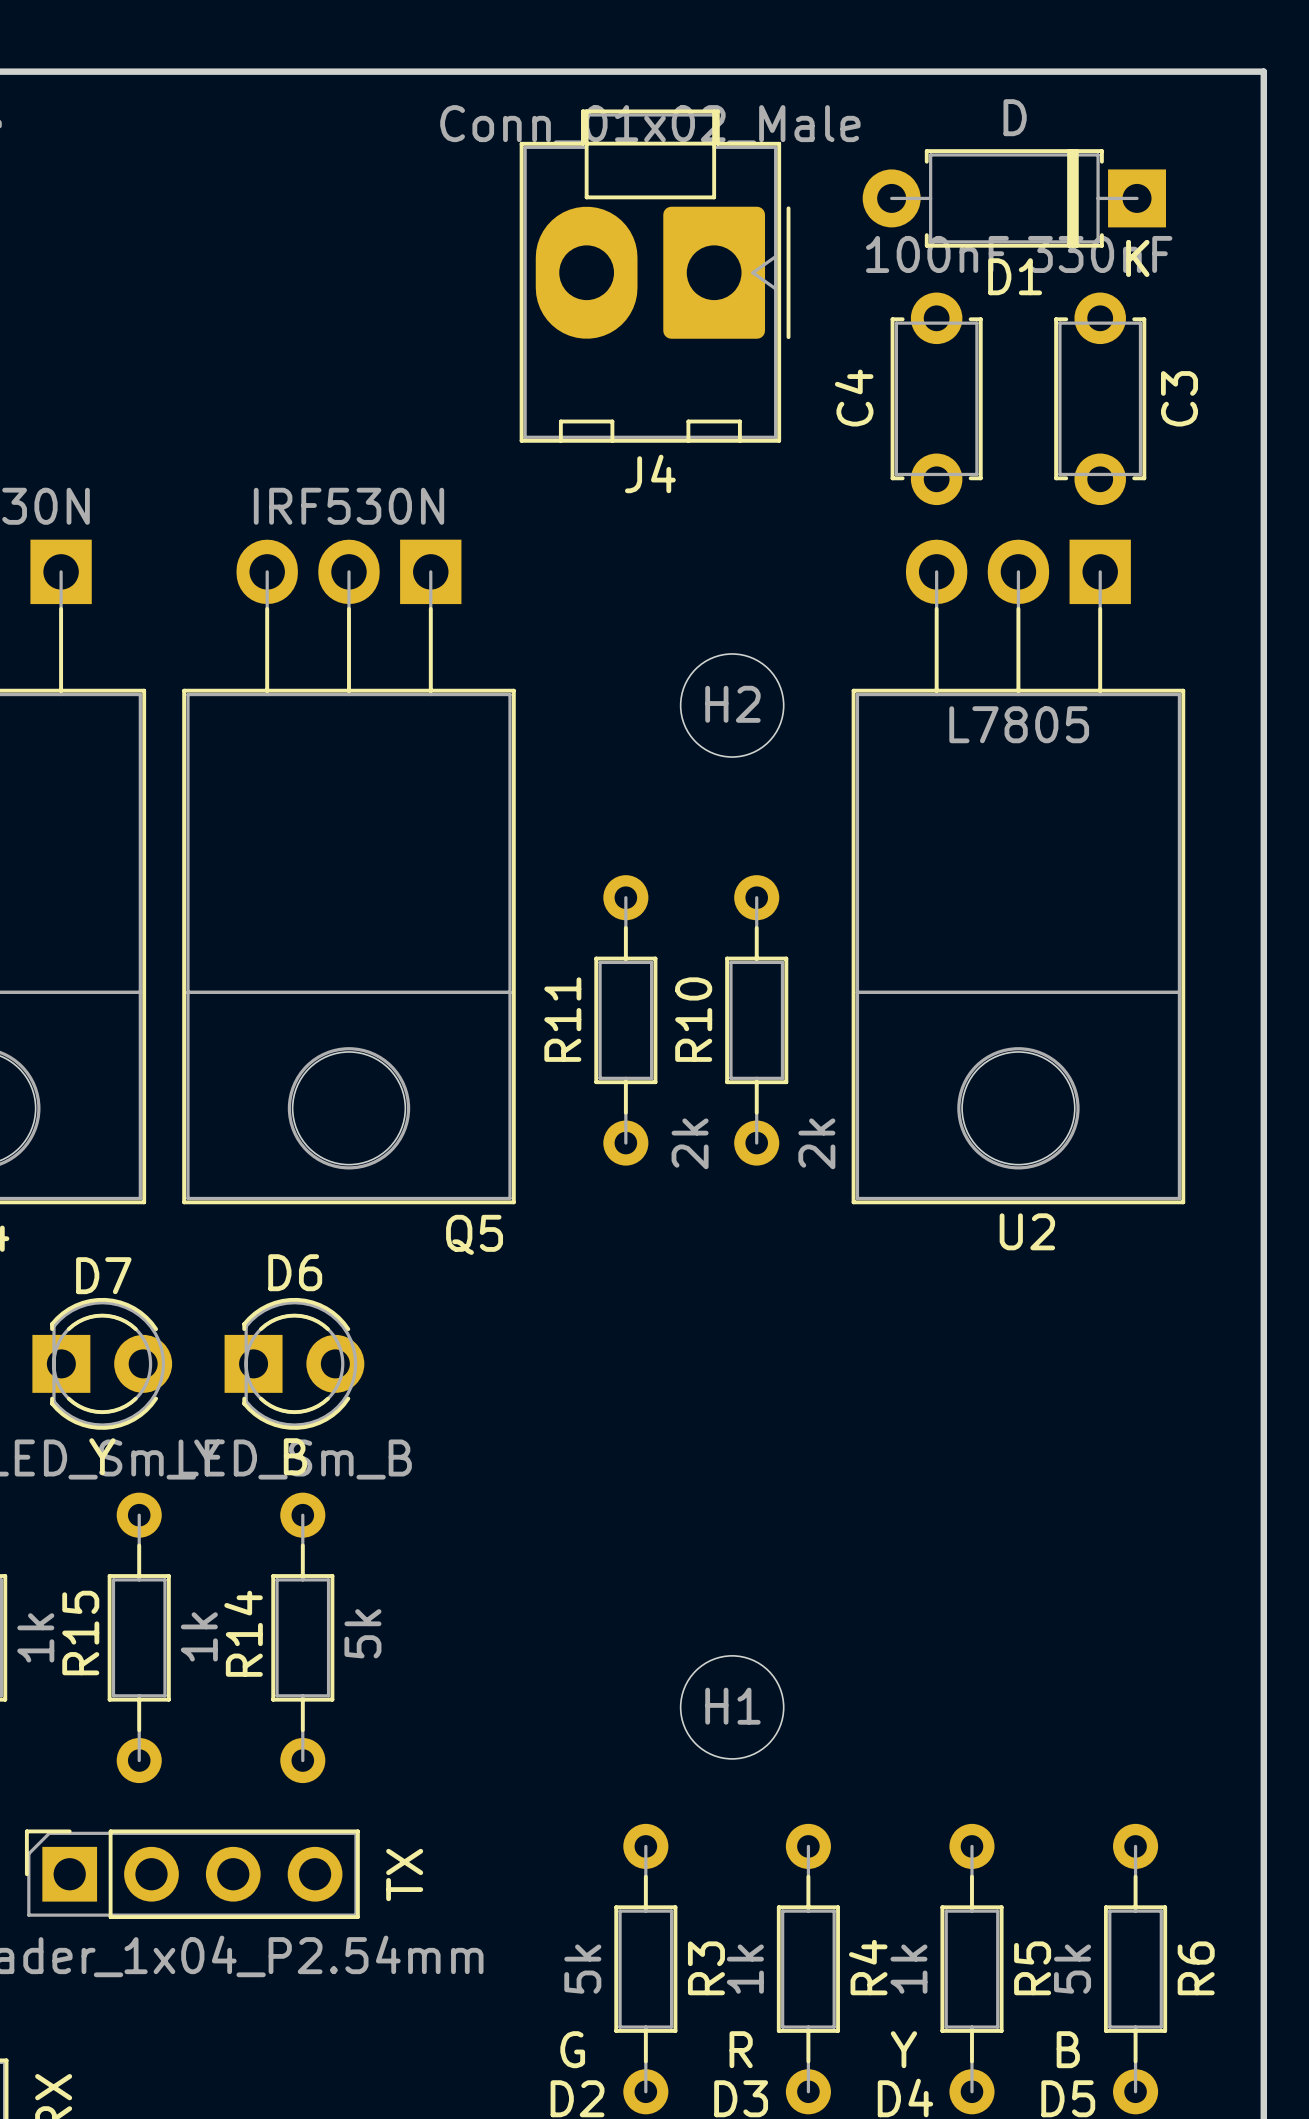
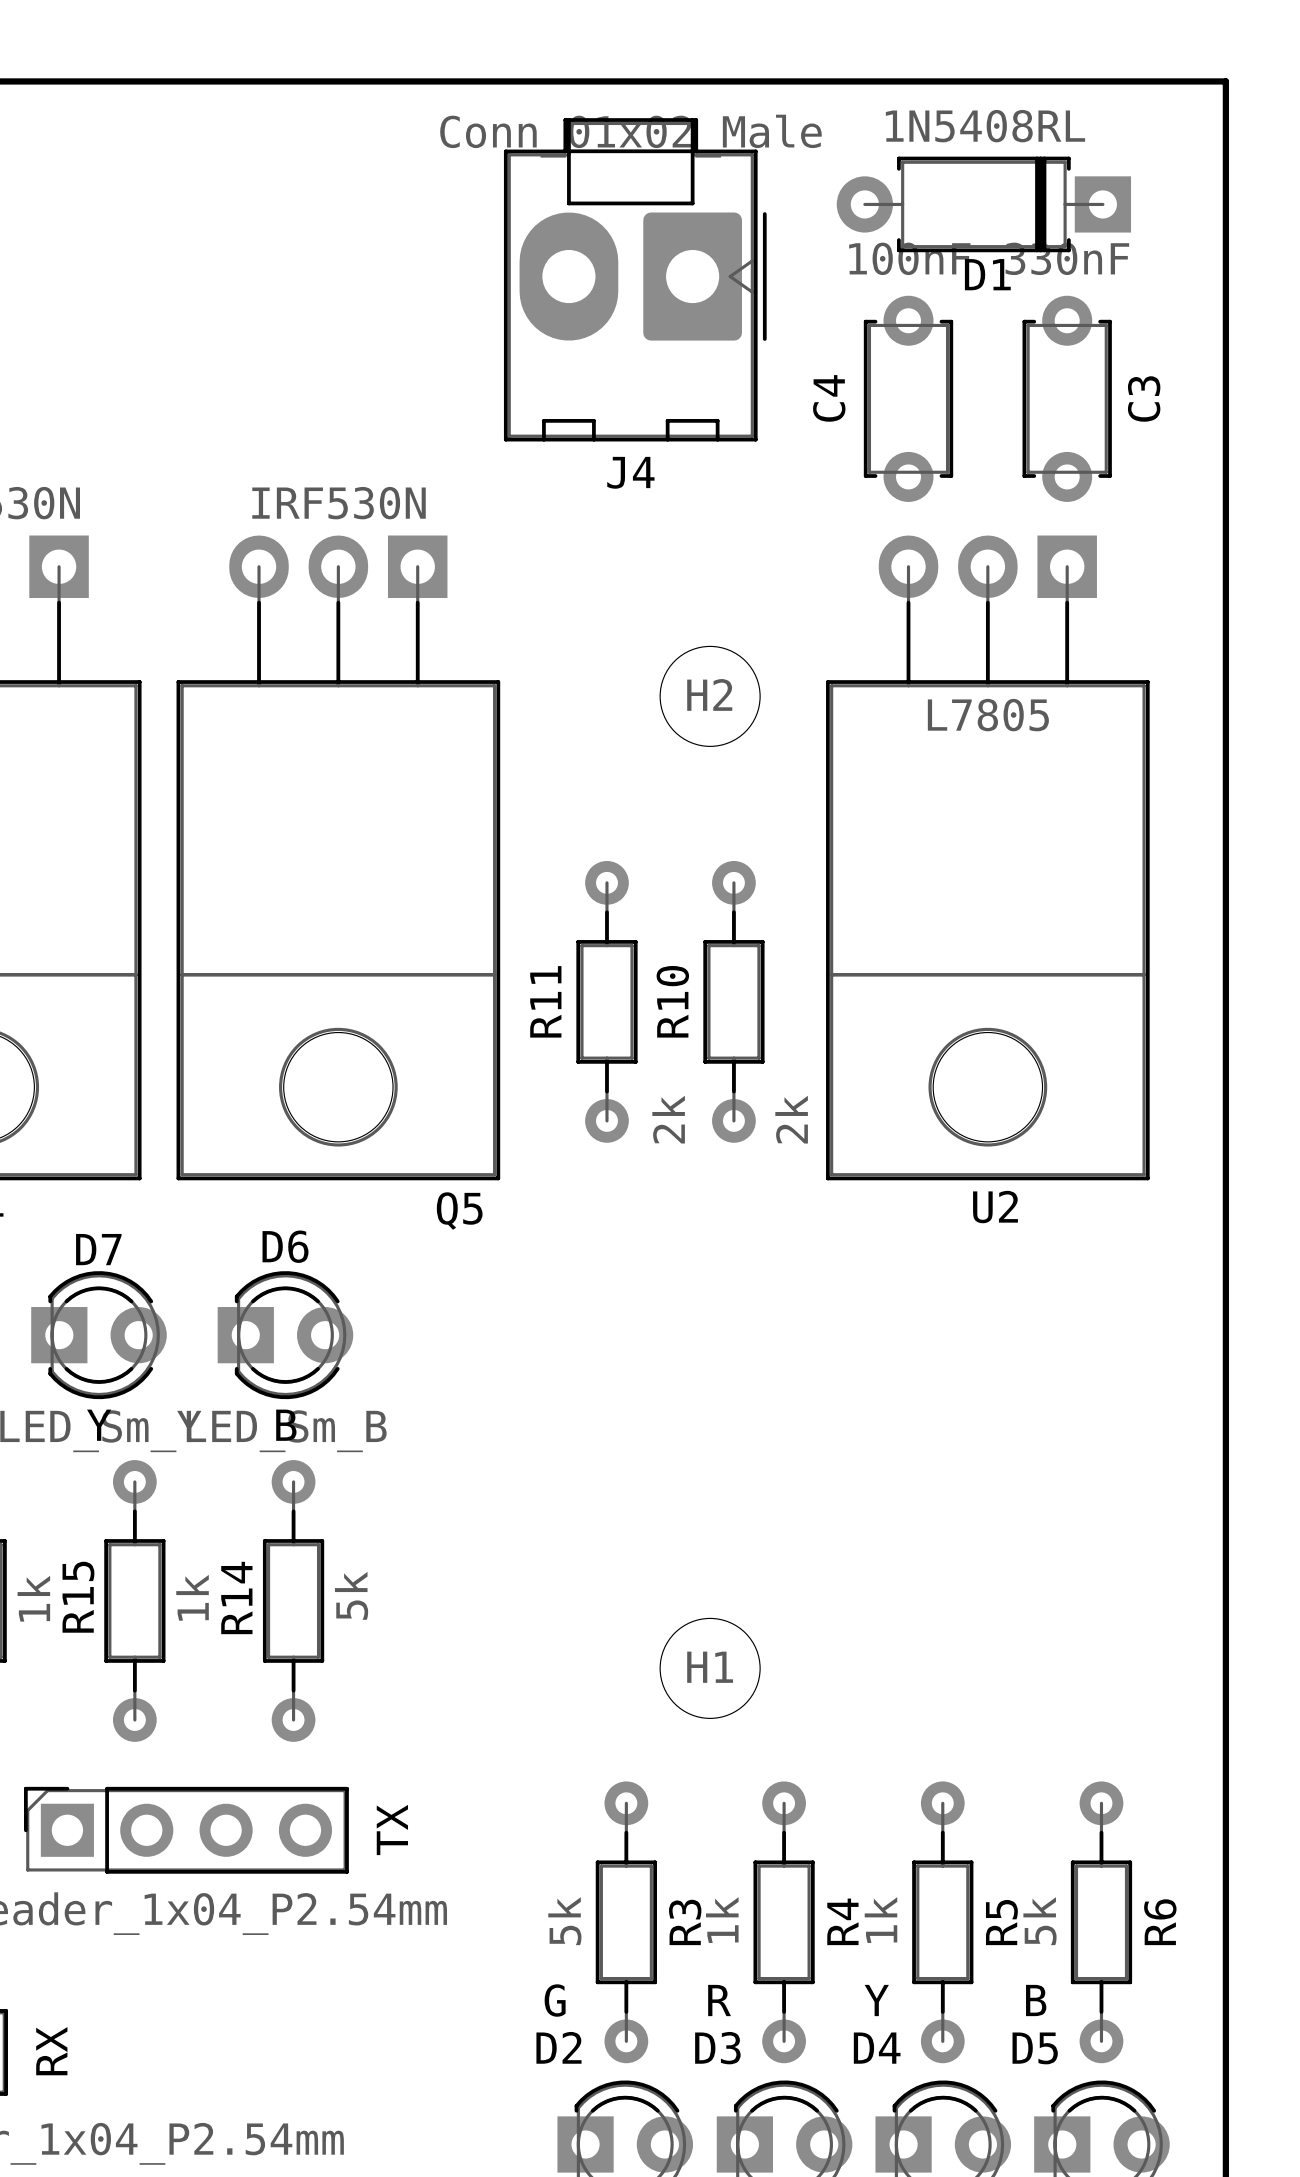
D1 value: D (1015, 117) -> 1N5408RL (985, 126)
D1 footprint: [862, 149, 1167, 248] -> [836, 156, 1132, 253]

